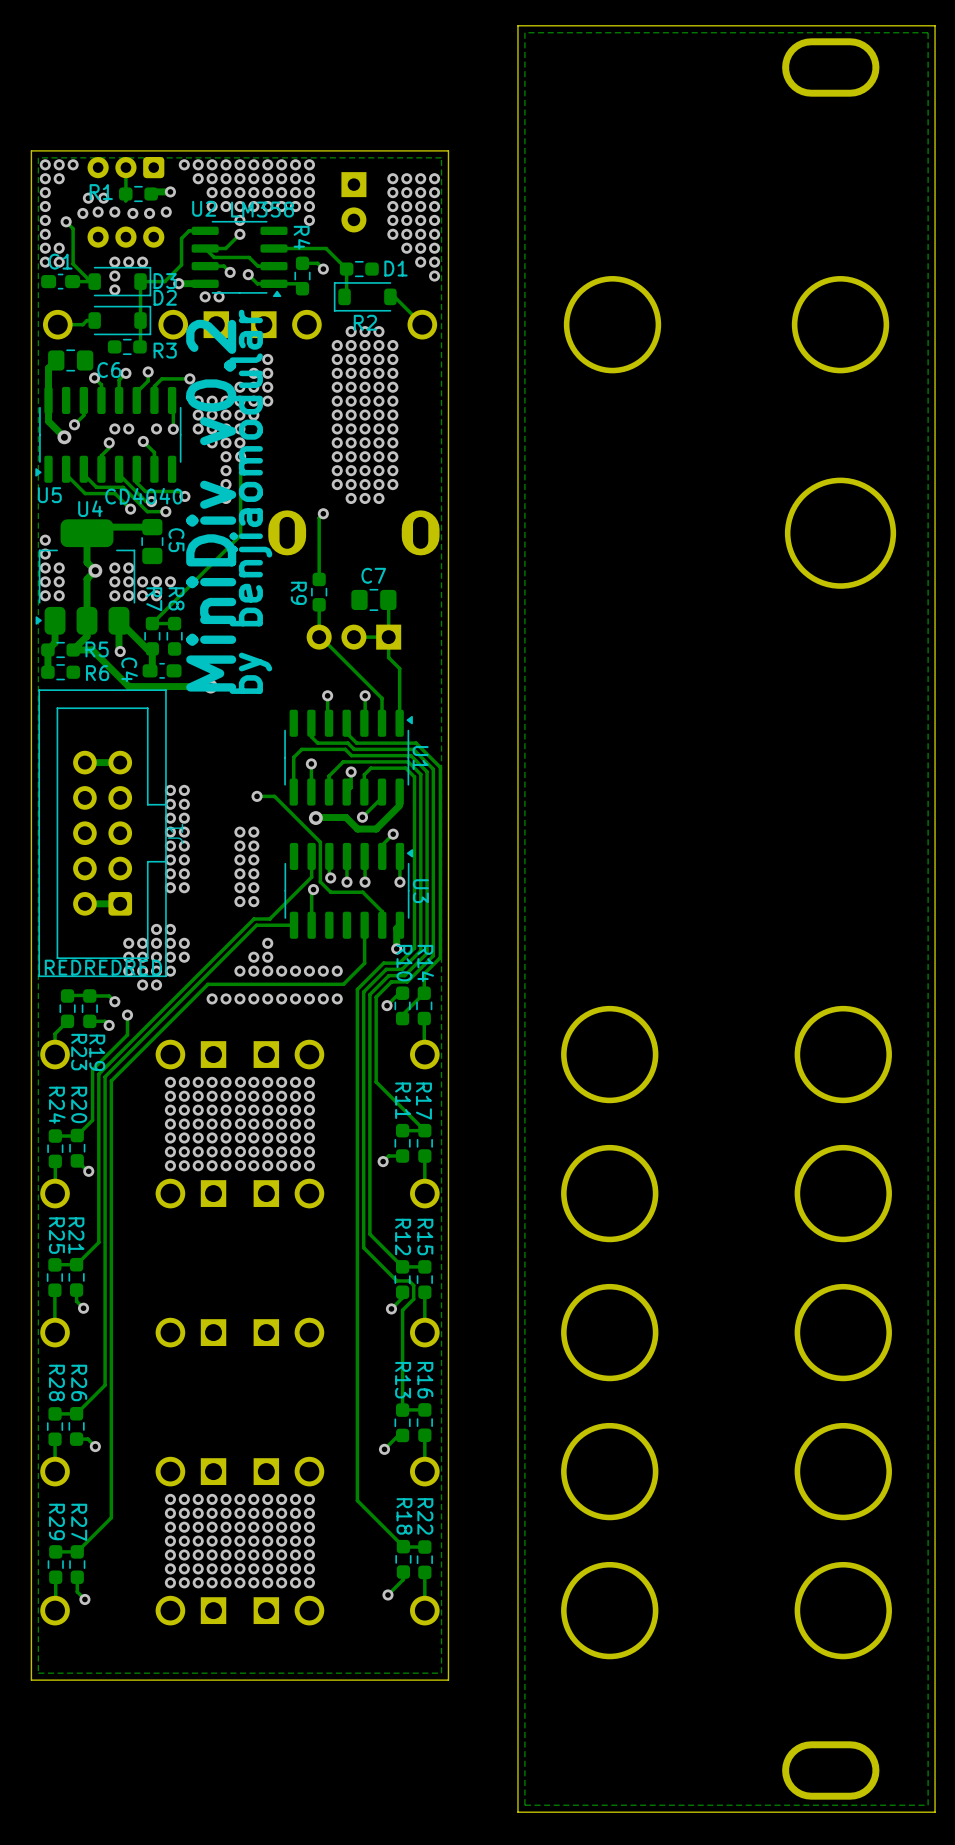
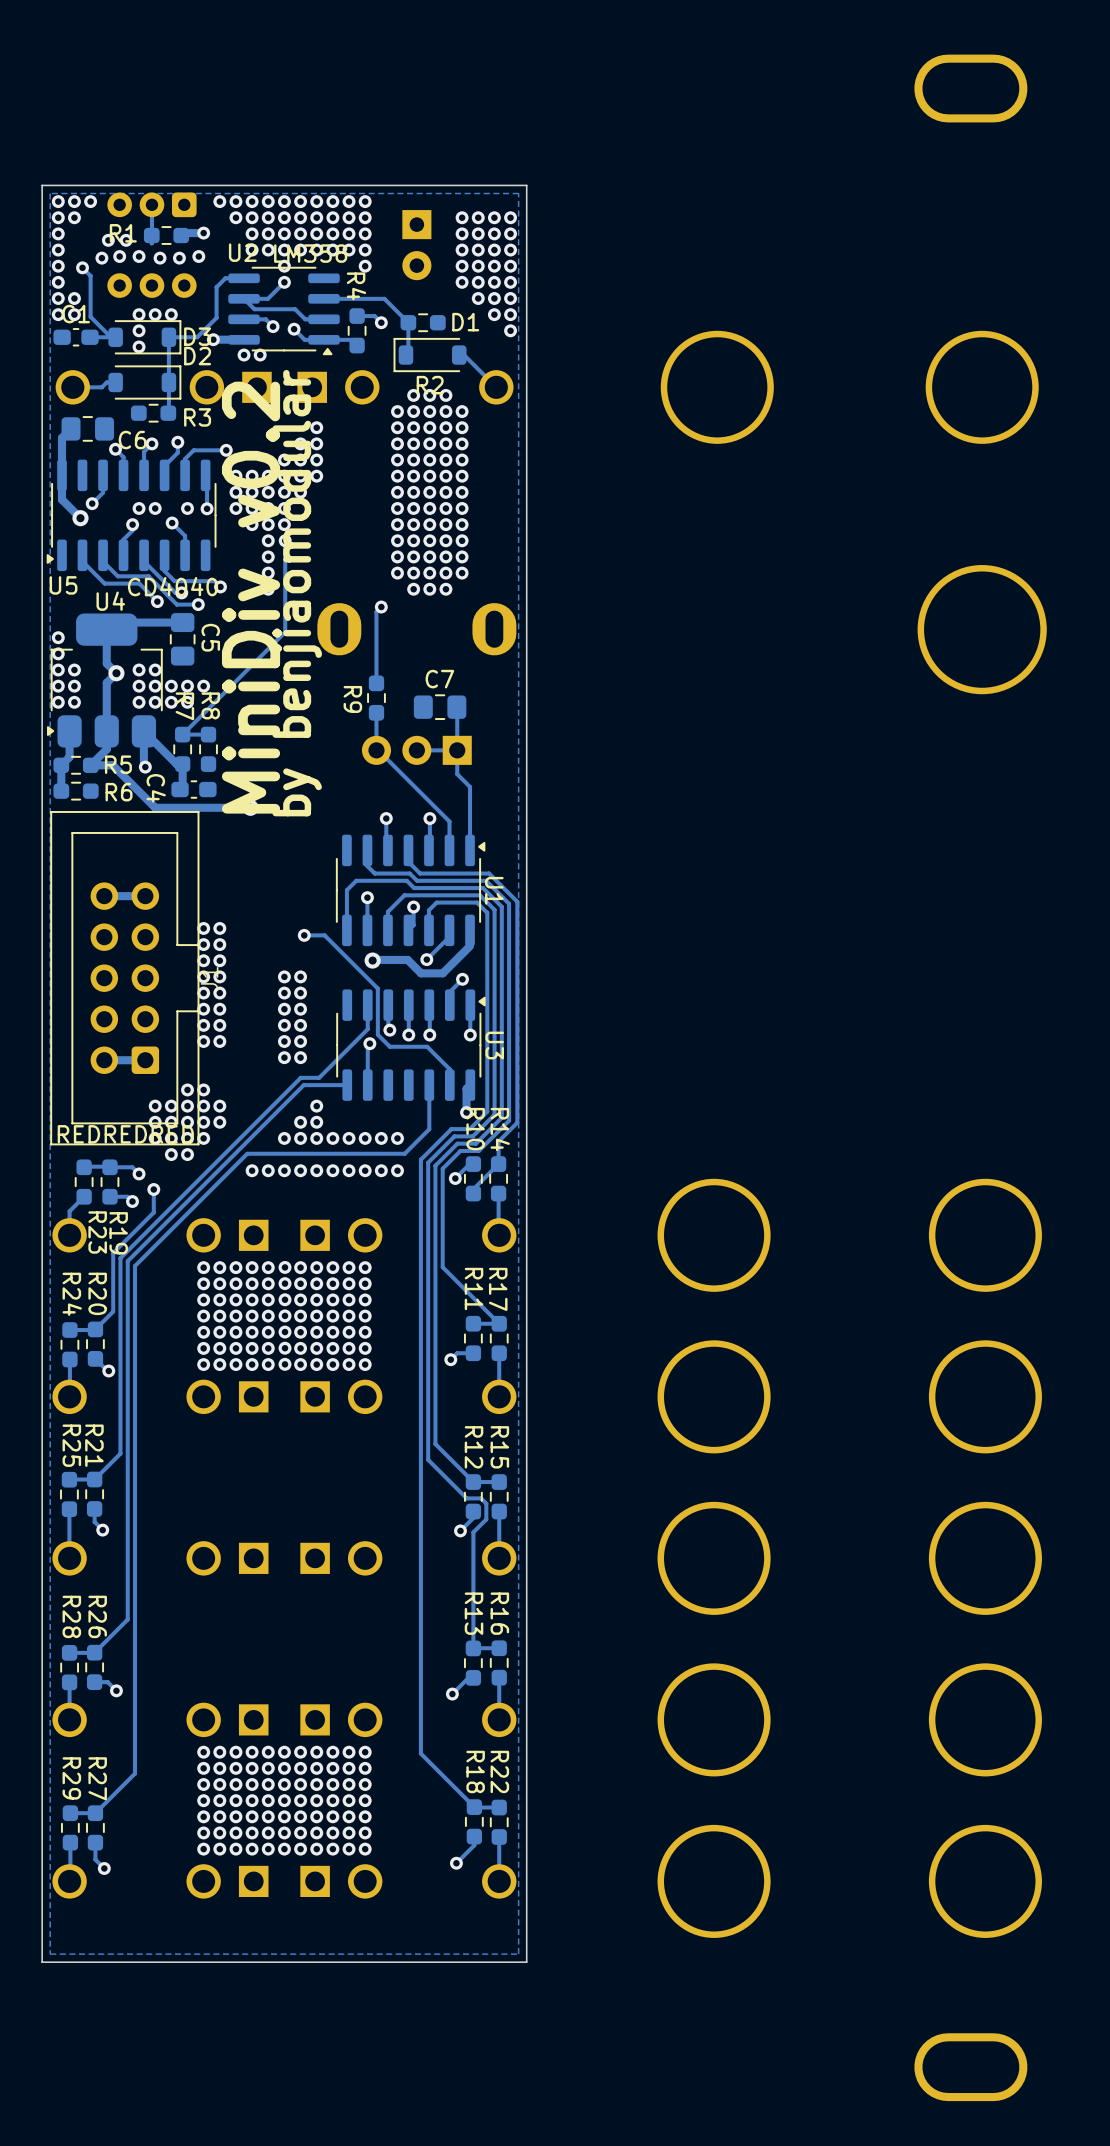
board edge: (935, 25) (517, 25) (517, 1812) (935, 1812) (935, 25) -> none
zone outline: (928, 32) (928, 1805) (524, 1805) (524, 32) (928, 32) -> none

